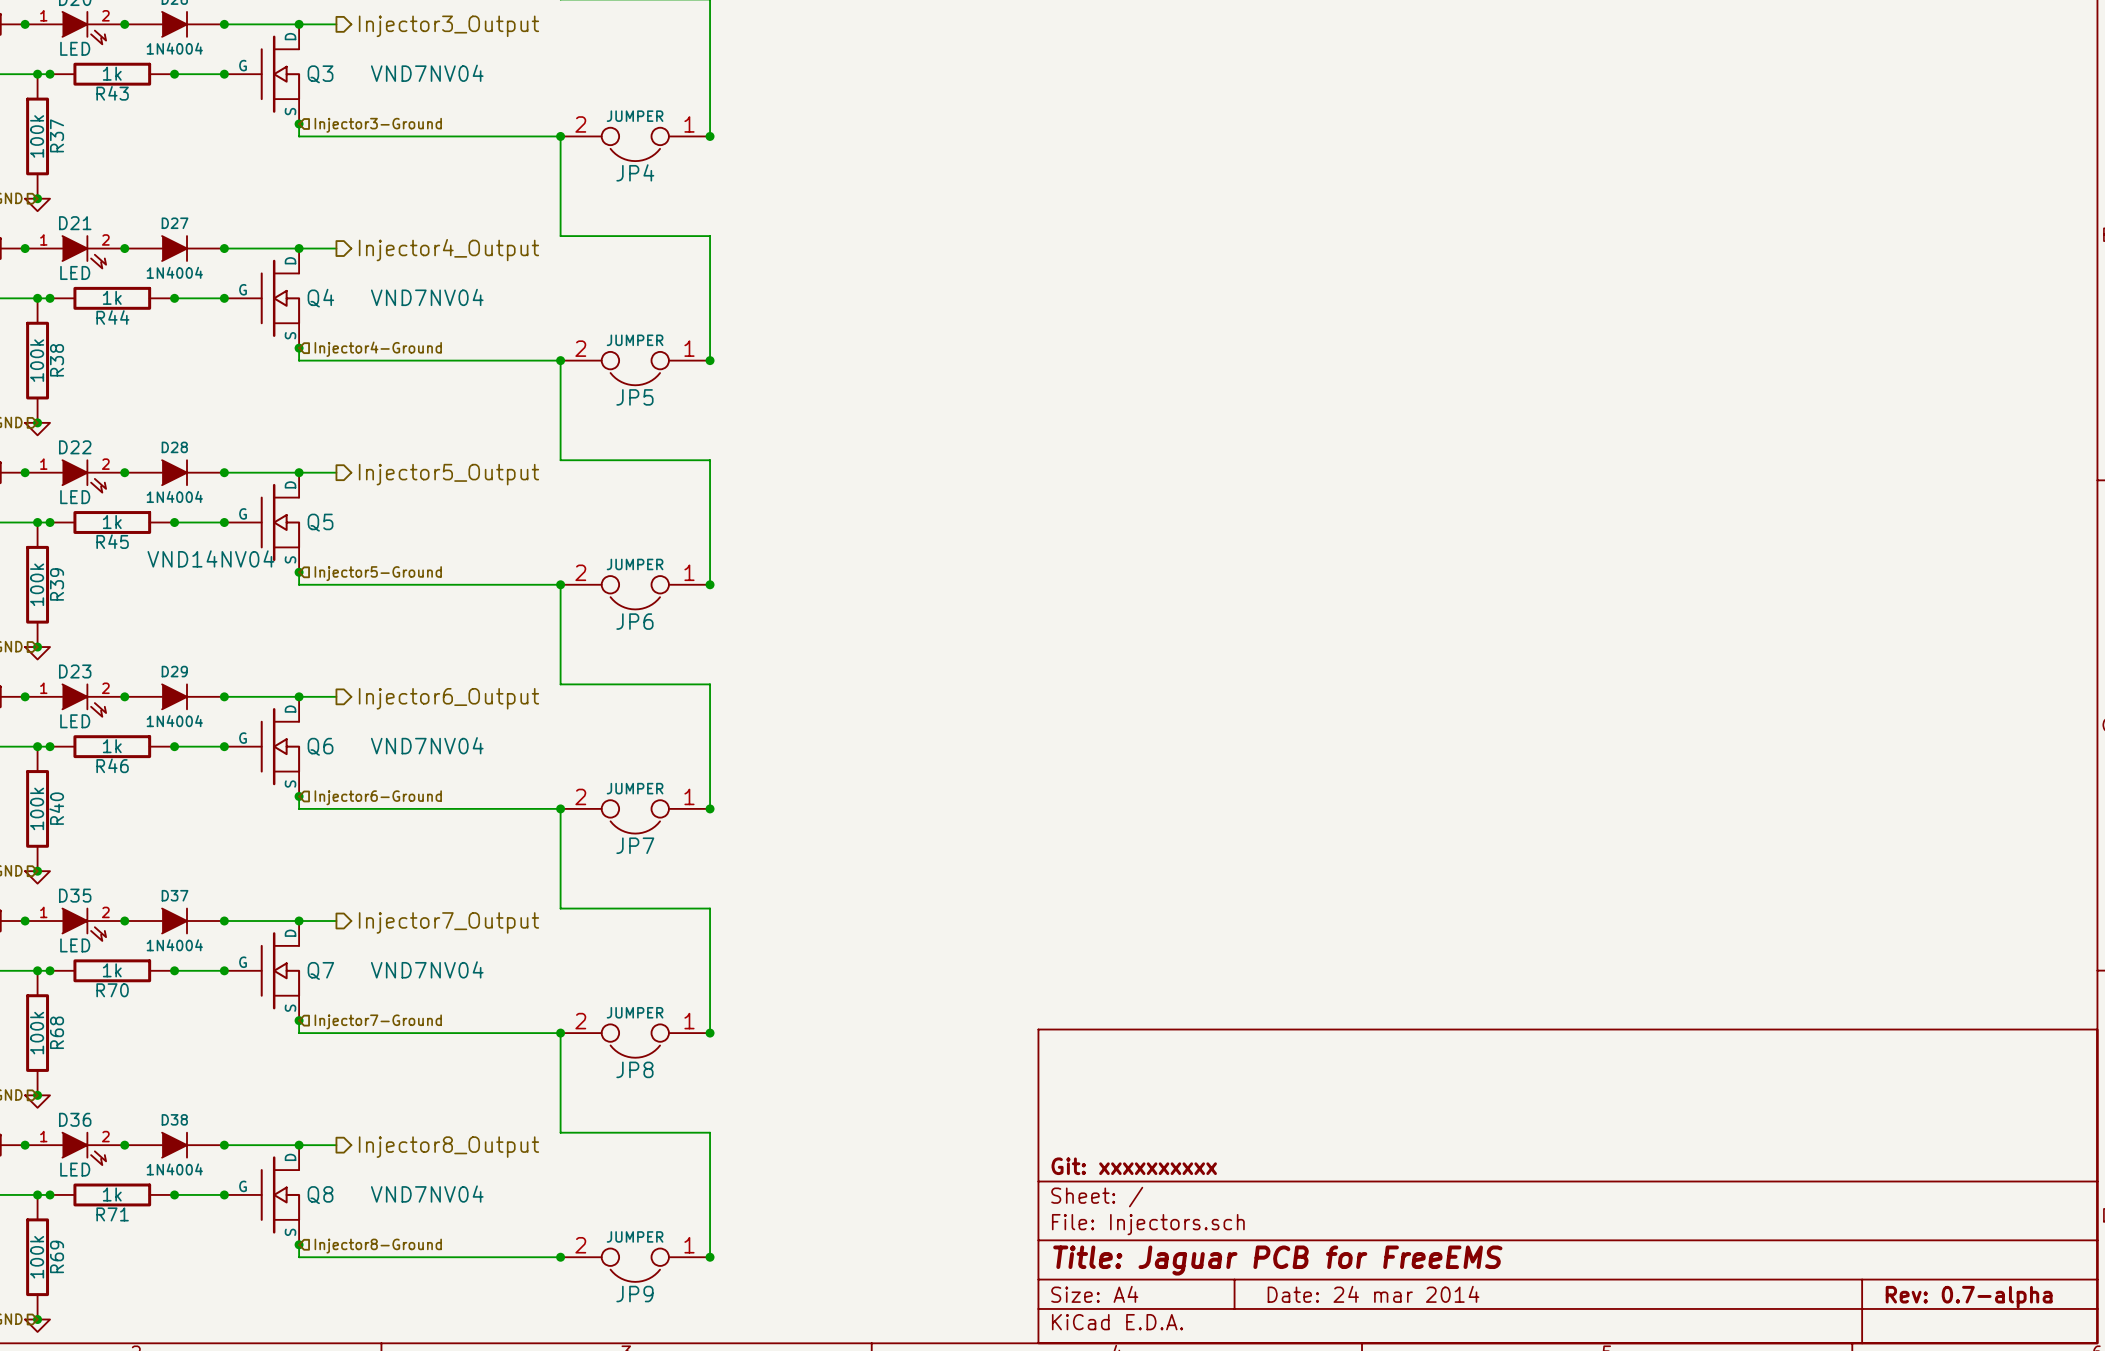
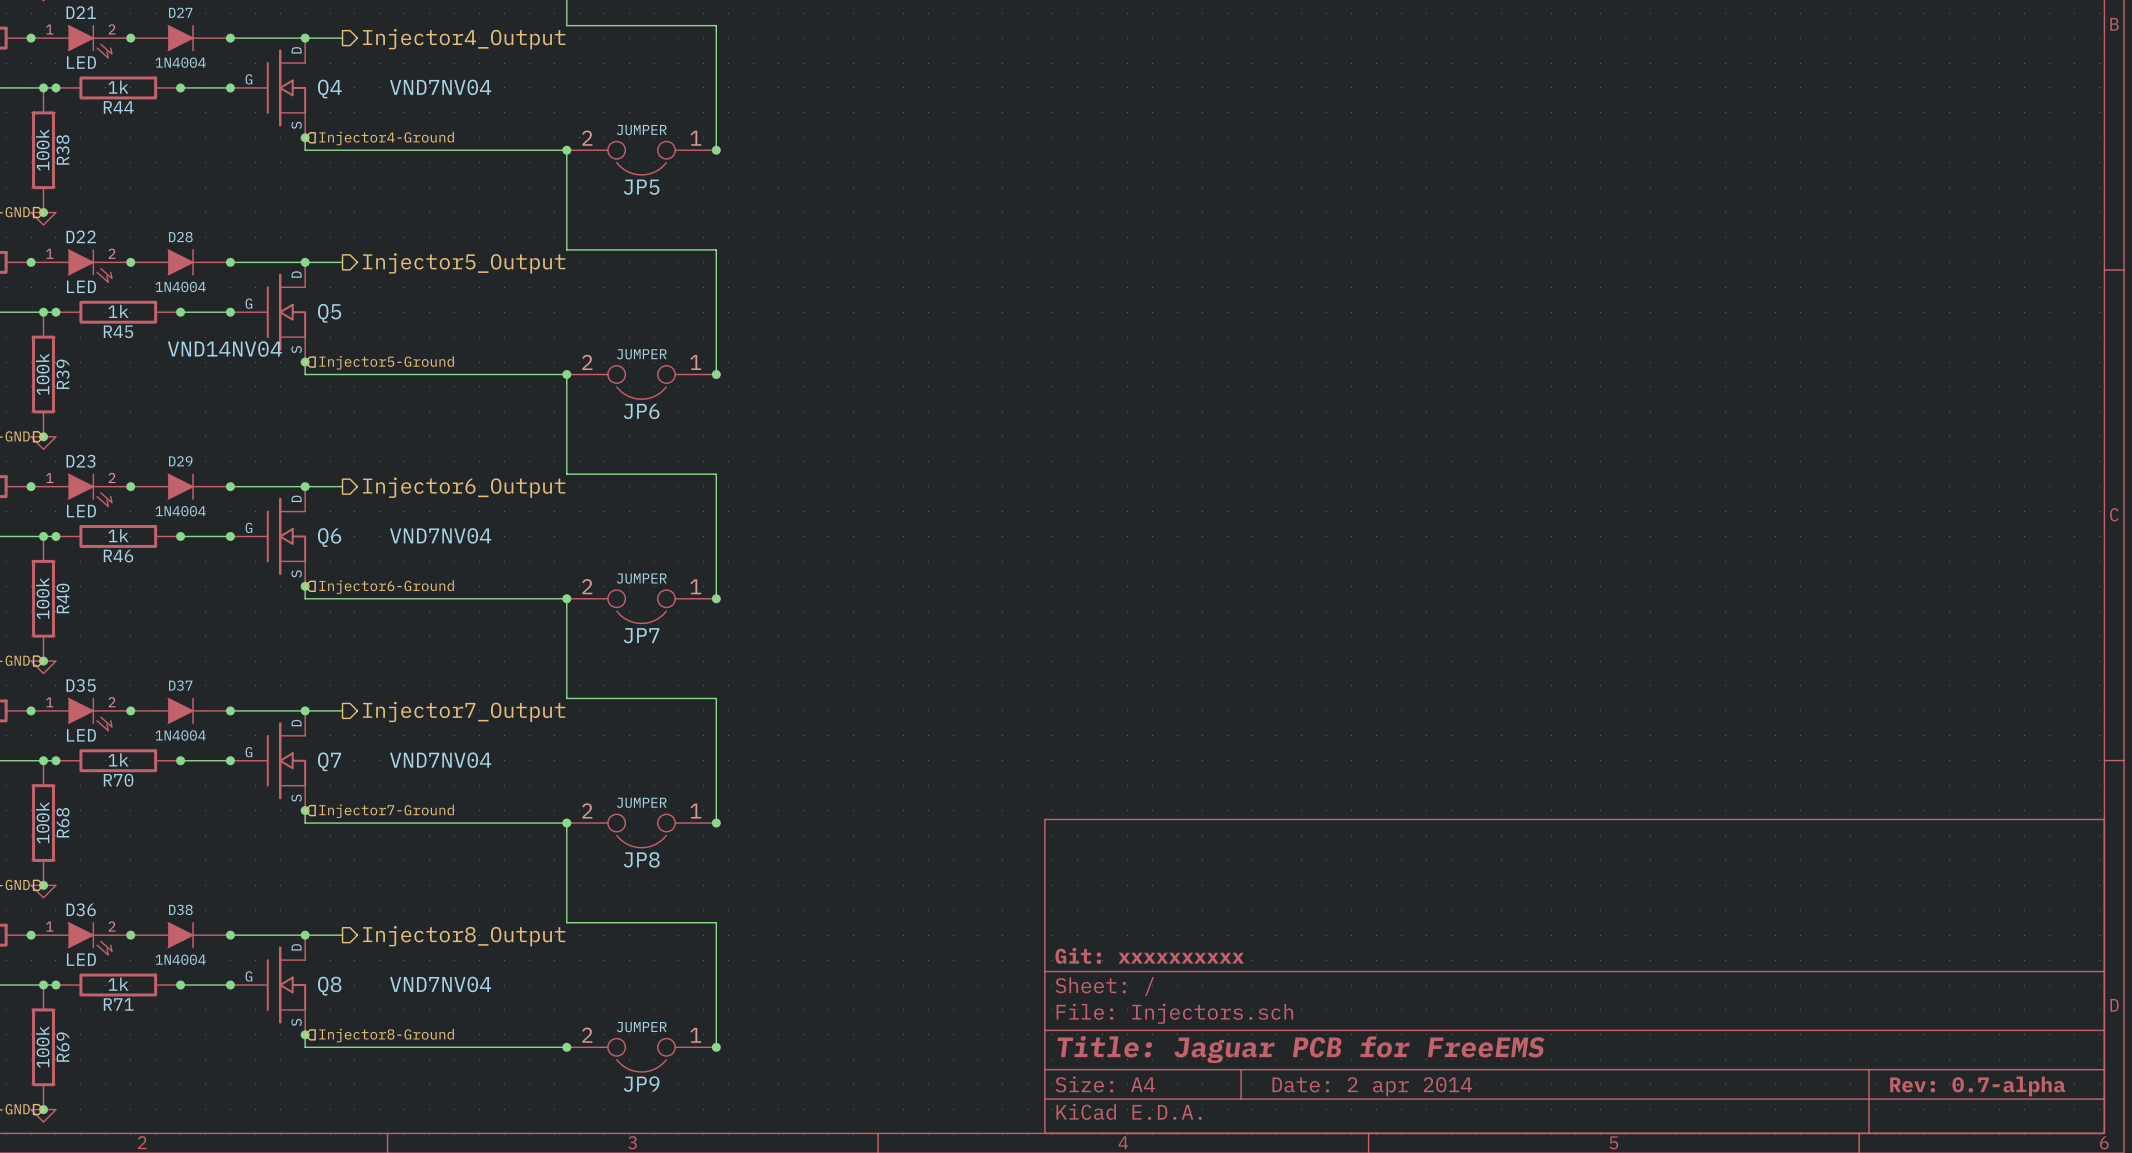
title block: Date: 24 mar 2014 (1373, 1294) -> Date: 2 apr 2014 (1372, 1086)

